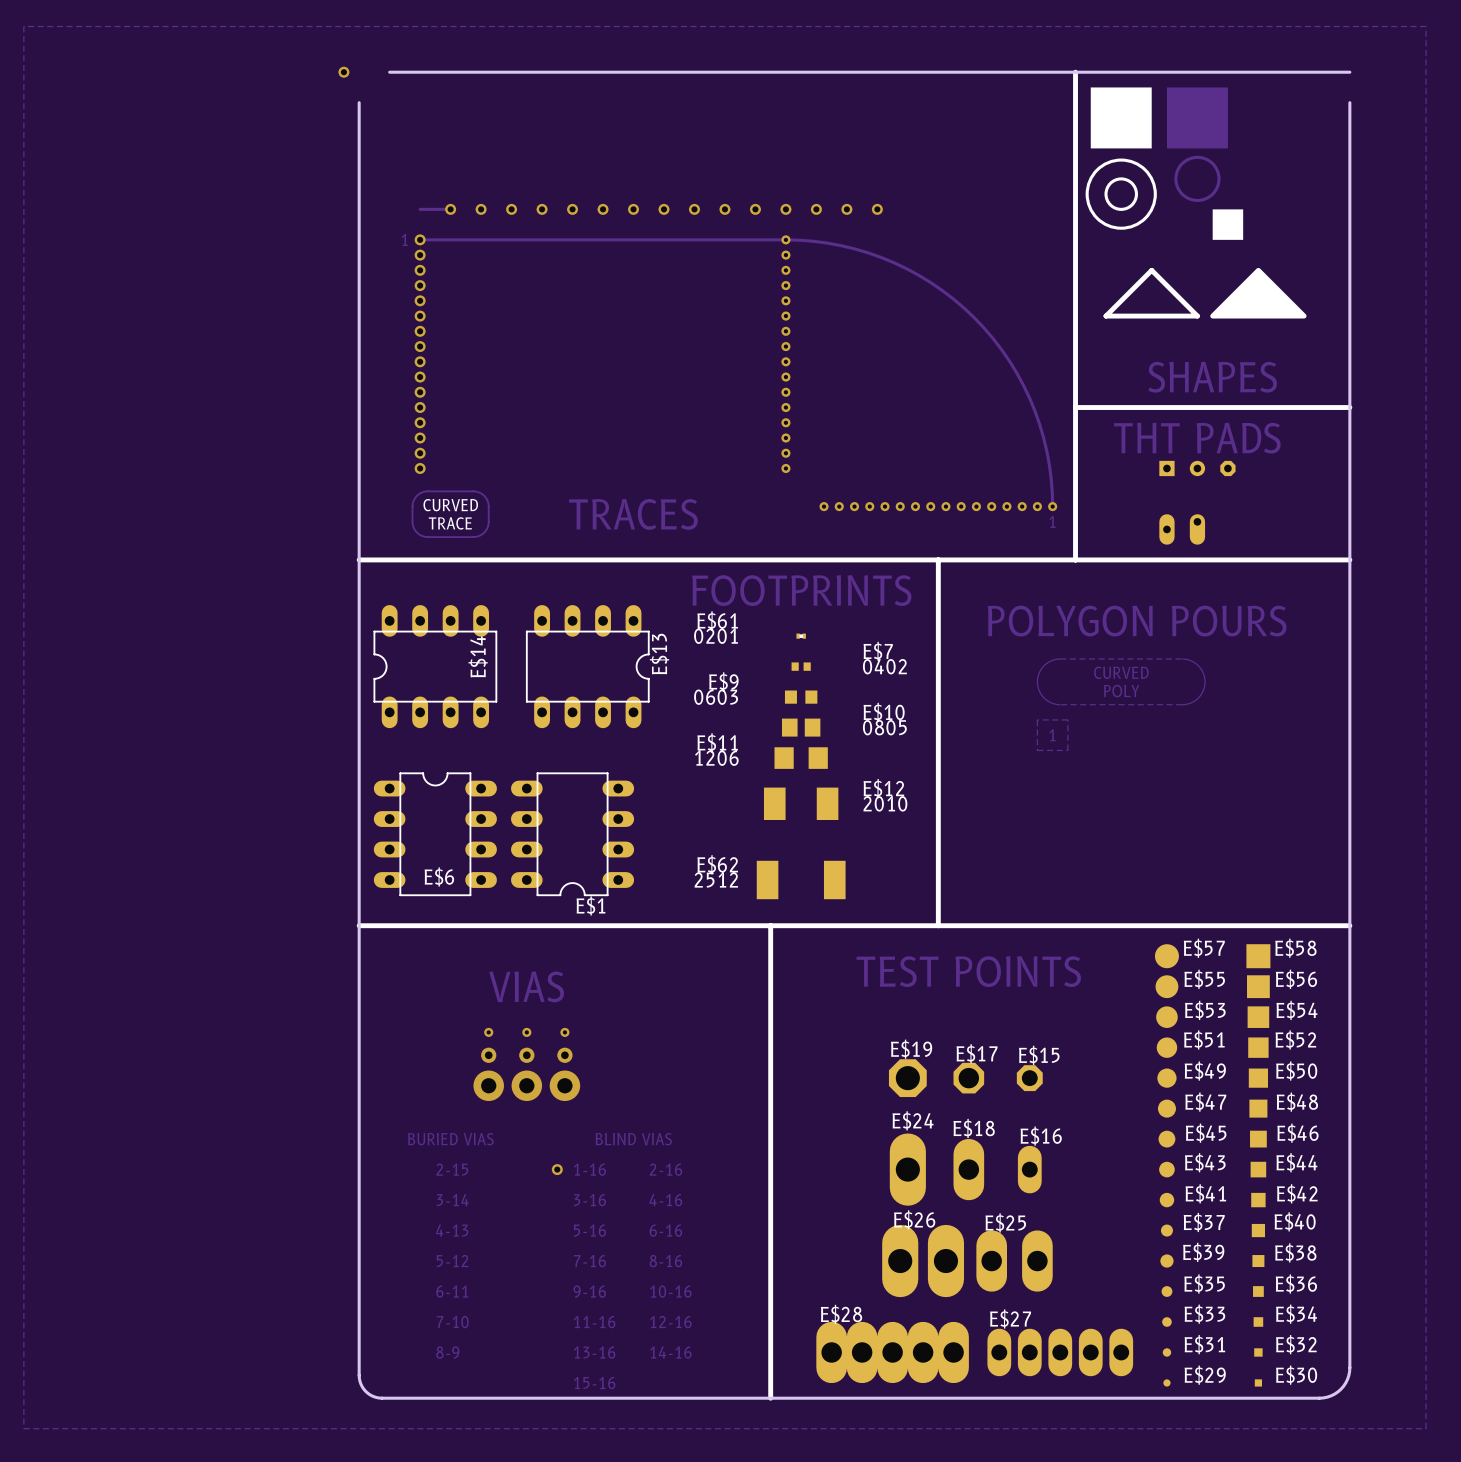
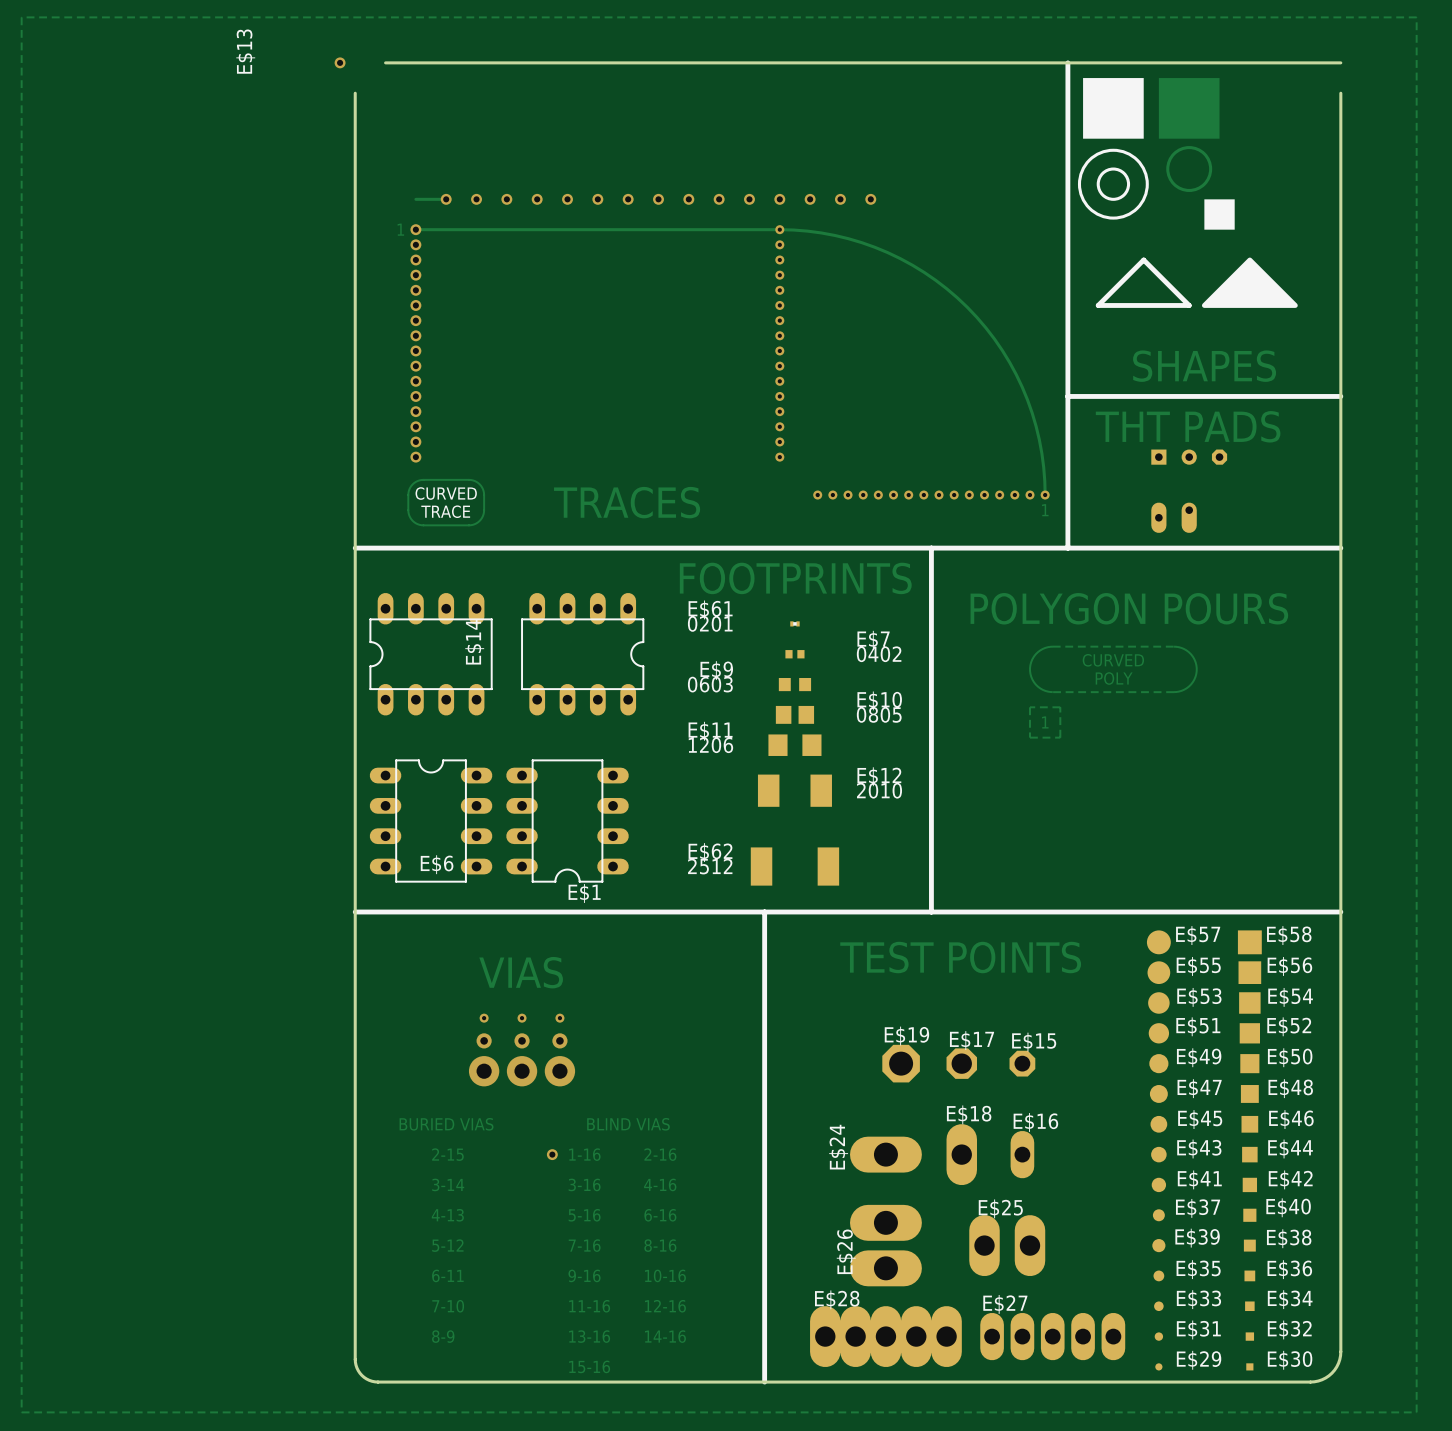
E$13 name position: E$13 (659, 654) -> E$13 (245, 51)
E$24 name position: E$24 (913, 1120) -> E$24 (838, 1147)
E$24 rotation: 0° (907, 1169) -> 90° clockwise (885, 1154)
E$26 name position: E$26 (914, 1219) -> E$26 (846, 1251)
E$26 rotation: 0° (923, 1261) -> 90° clockwise (885, 1245)

